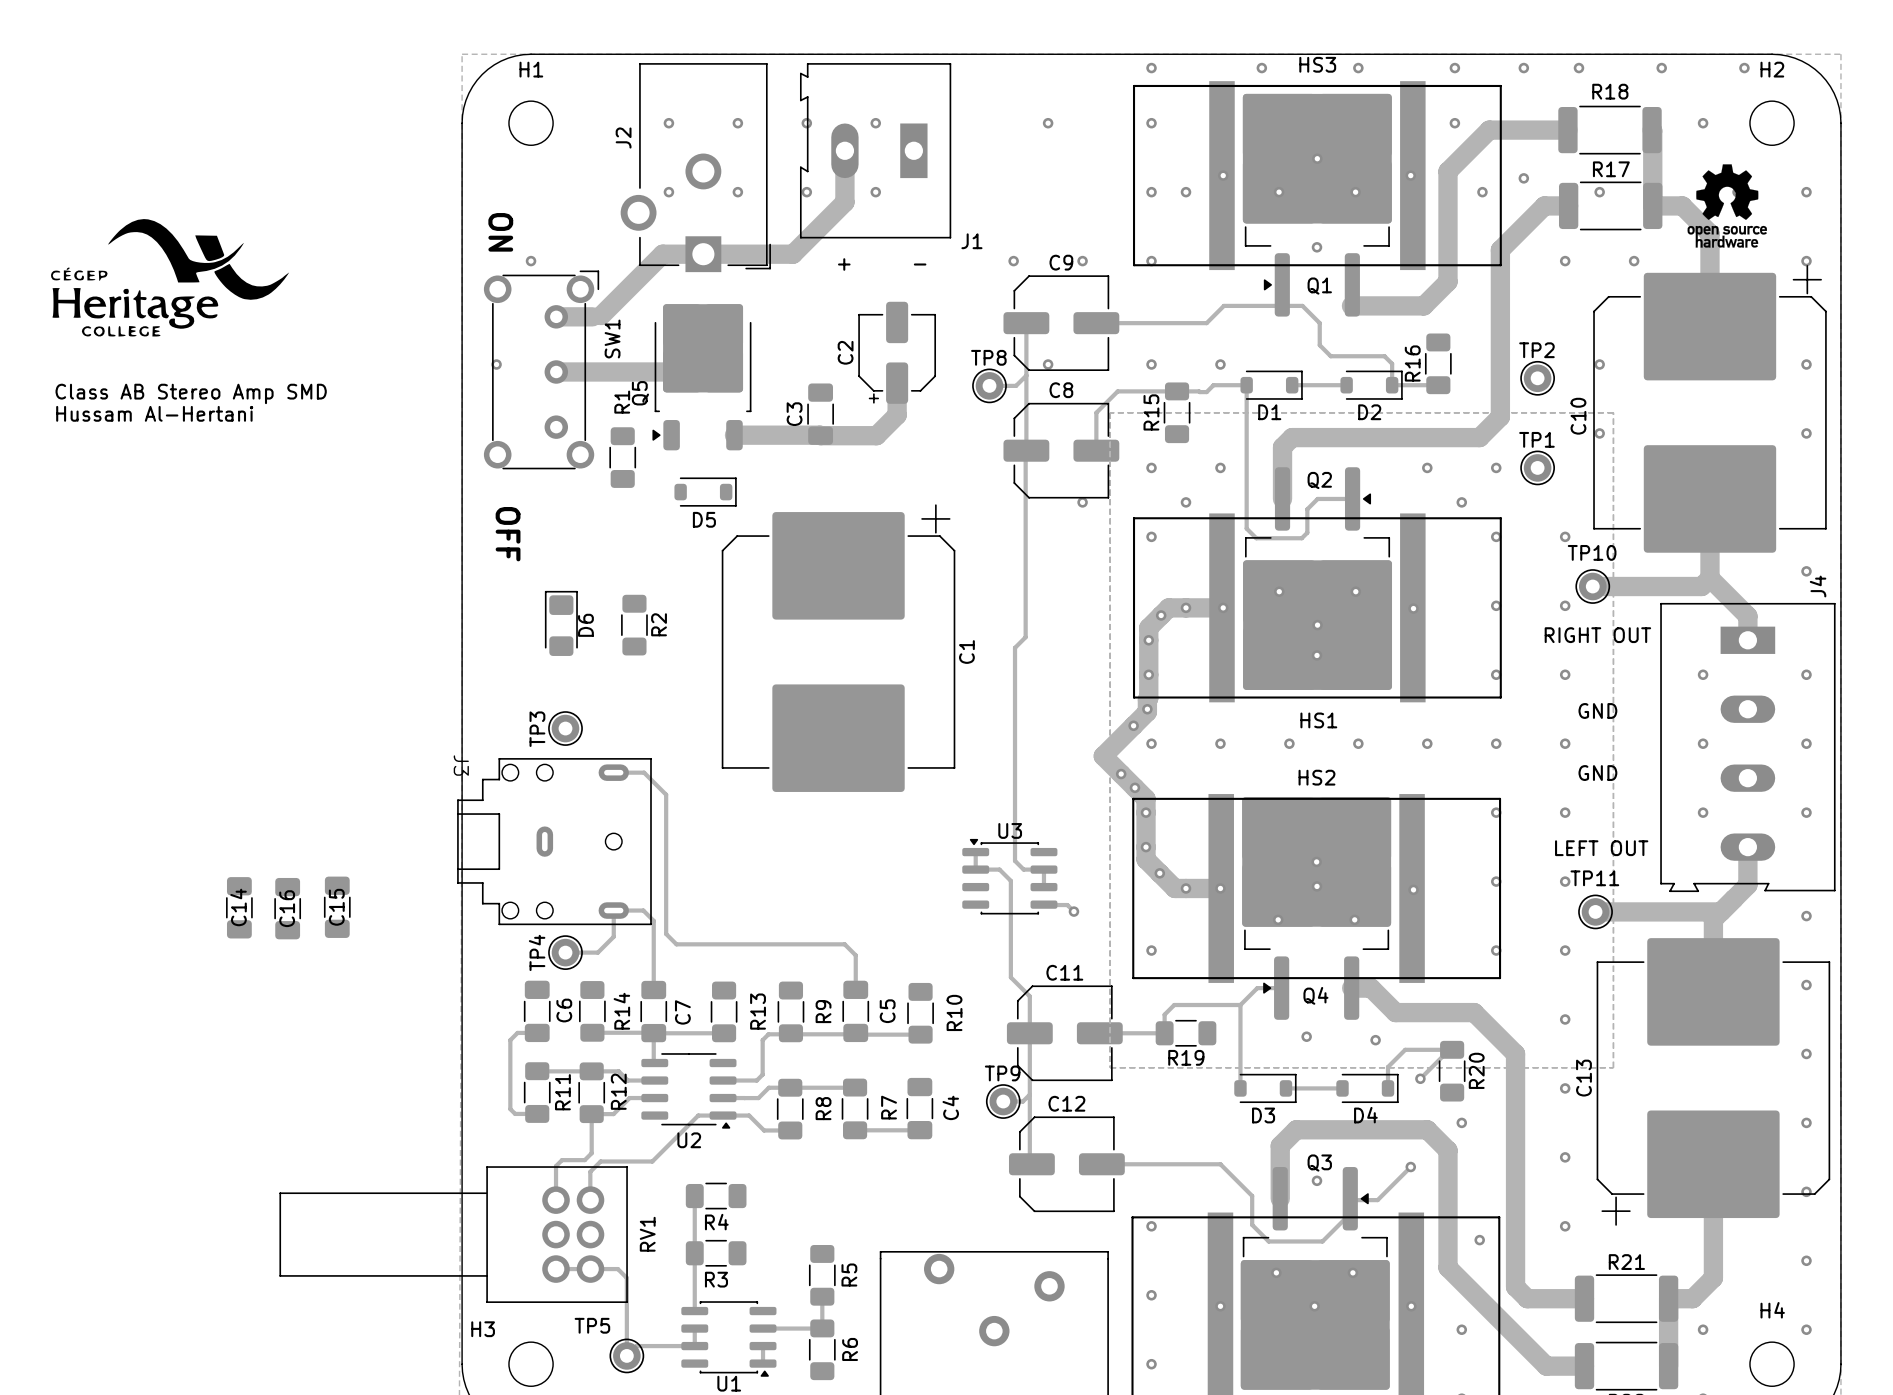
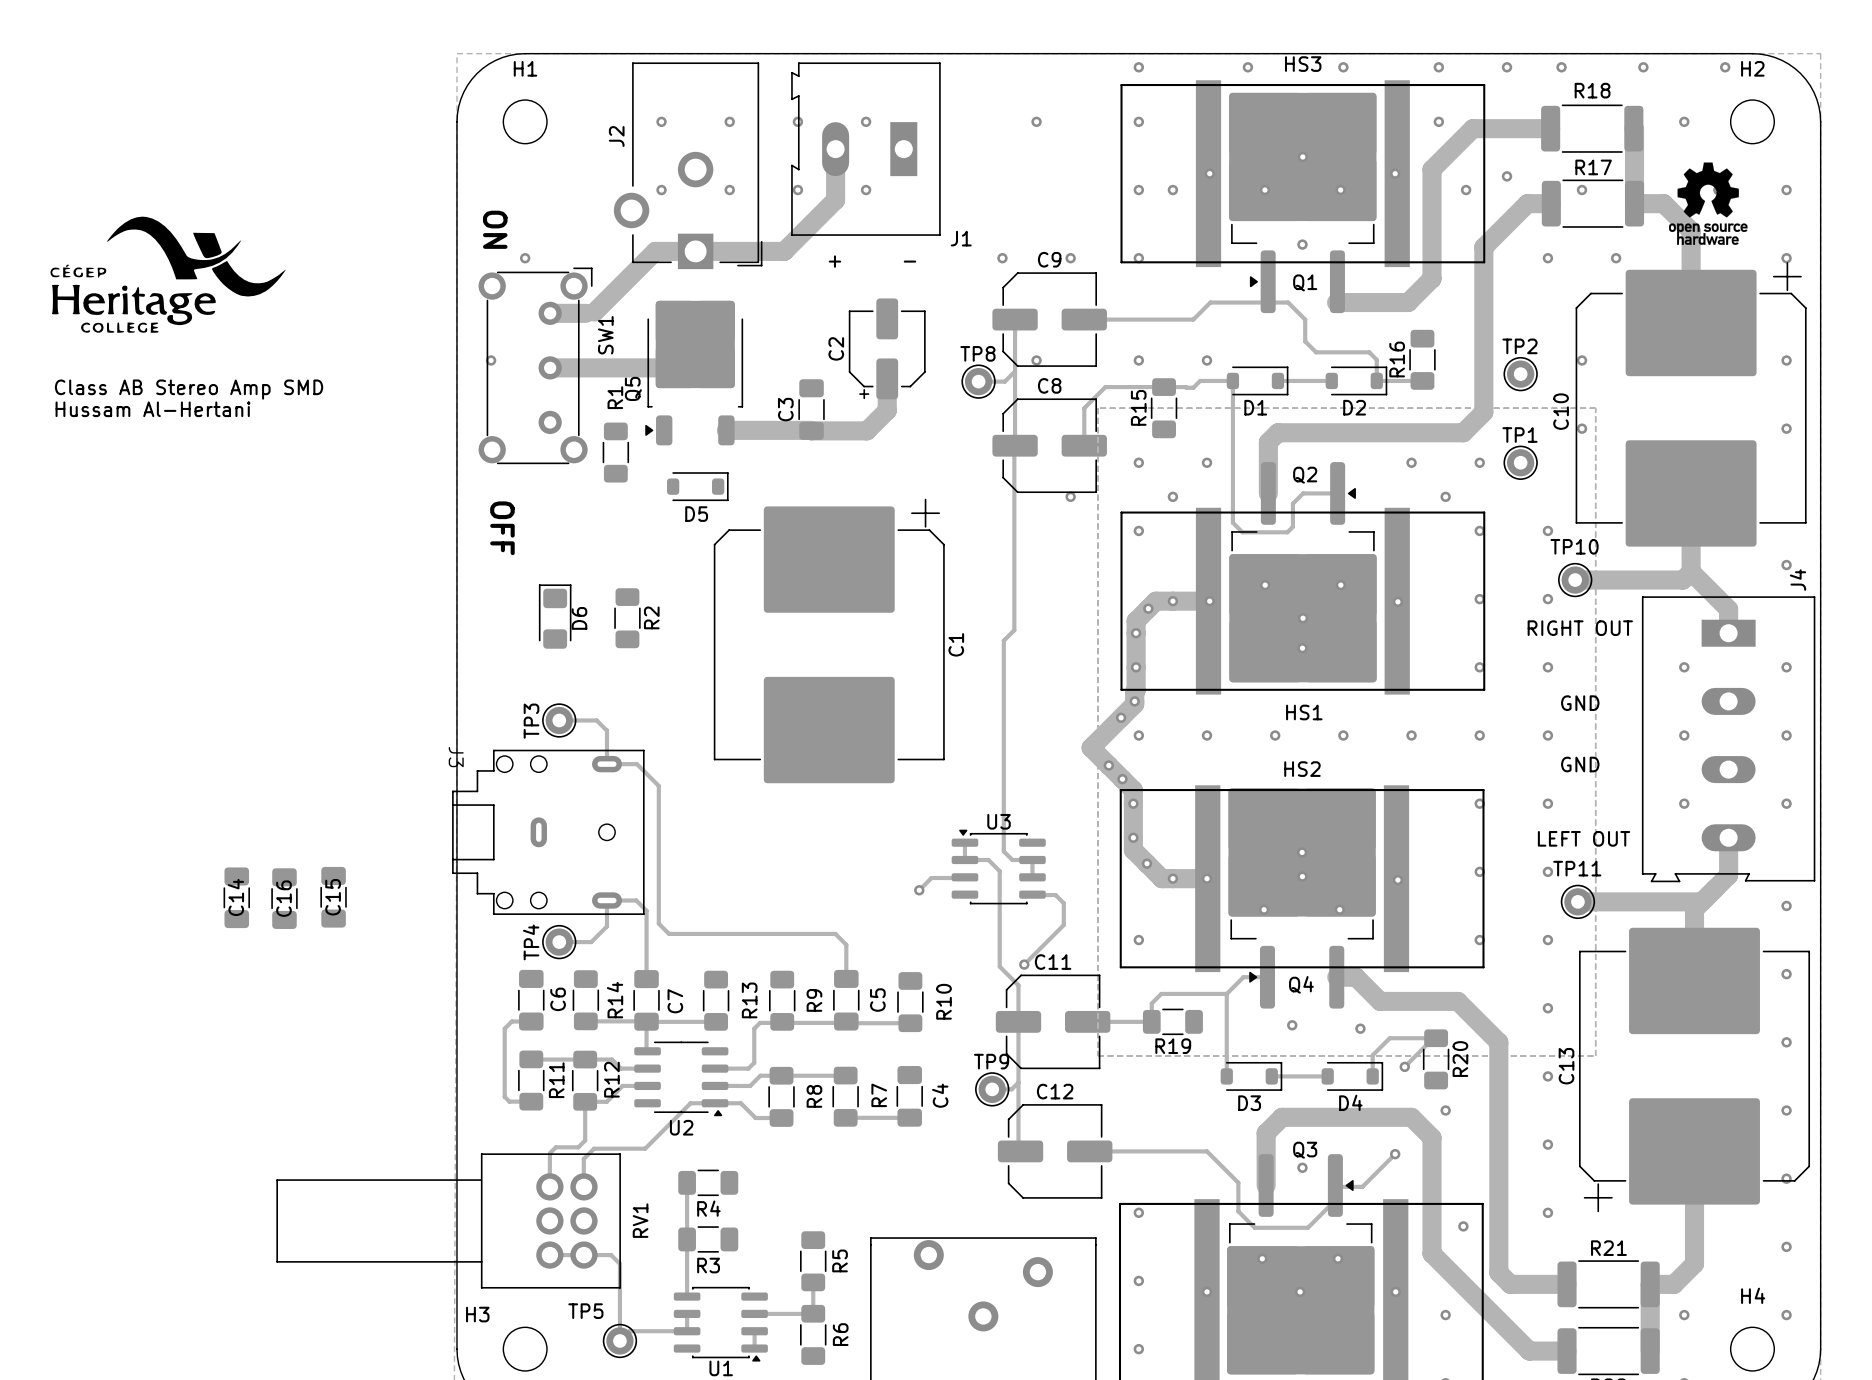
track: none -> (559, 720) (596, 720) (606, 730) (606, 764)
track: none -> (964, 878) (931, 878) (919, 890)
via: none -> (919, 890)
track: none -> (1062, 901) (1063, 903) (1063, 925) (1024, 964)
via: (1073, 911) -> none
via: none -> (1024, 964)

